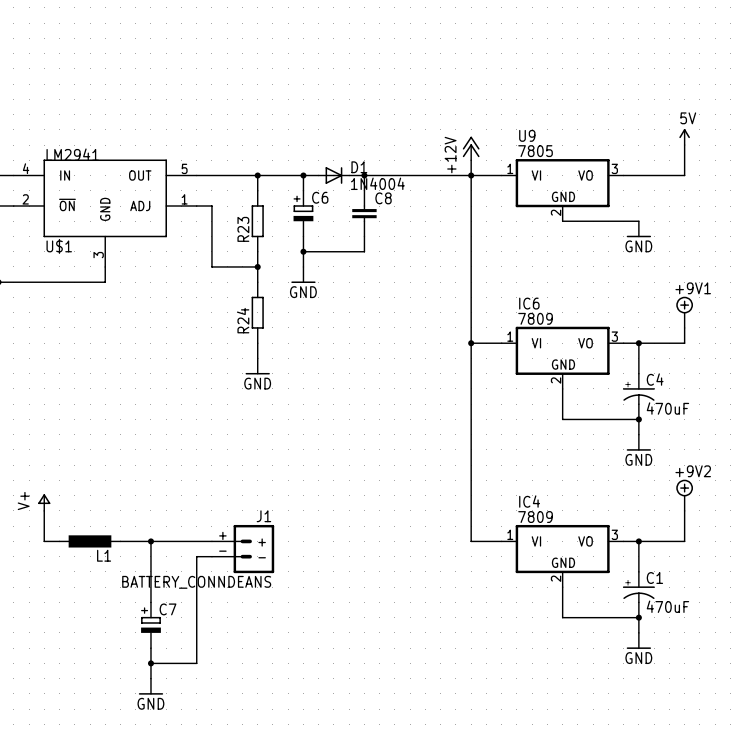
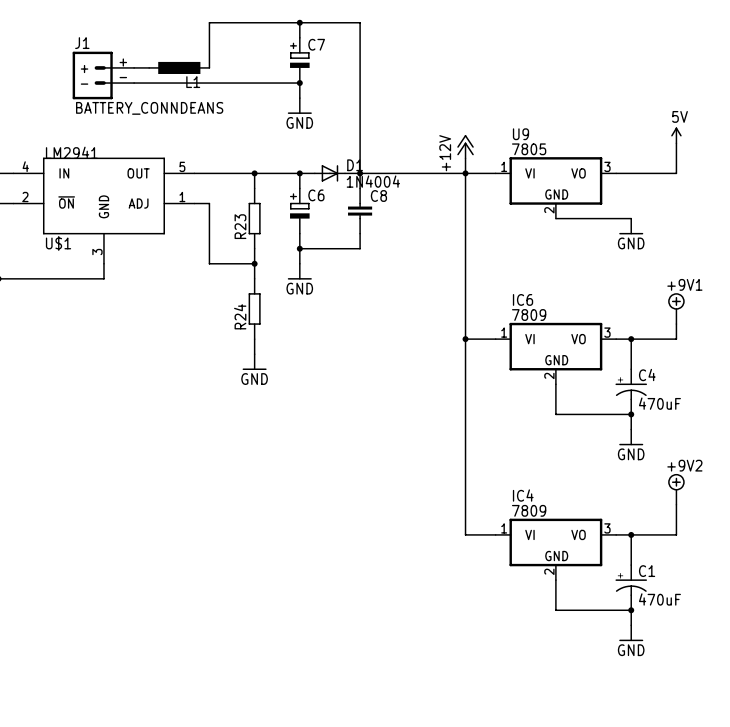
wire: none -> (299, 22) (299, 37)
junction: none -> (299, 22)
wire: none -> (134, 67) (149, 67)
wire: none -> (209, 67) (209, 22) (360, 22) (360, 173)
wire: none -> (134, 83) (299, 83) (299, 98)
junction: none -> (299, 83)
power symbol: none -> GND (299, 105)
power symbol: V+ (44, 502) -> none
wire: (44, 510) (44, 541) (59, 541) -> none
L1 position: (90, 541) -> (179, 67)
wire: (120, 541) (211, 541) -> none
wire: (150, 541) (150, 602) -> none
junction: (150, 541) -> none
J1 position: (243, 549) -> (103, 75)
J1 flip: as is (253, 549) -> left-right (92, 75)
wire: (211, 556) (196, 556) (196, 663) (150, 663) -> none
C7 position: (150, 625) -> (299, 60)
wire: (150, 648) (150, 678) -> none
junction: (150, 663) -> none
power symbol: GND (150, 686) -> none

